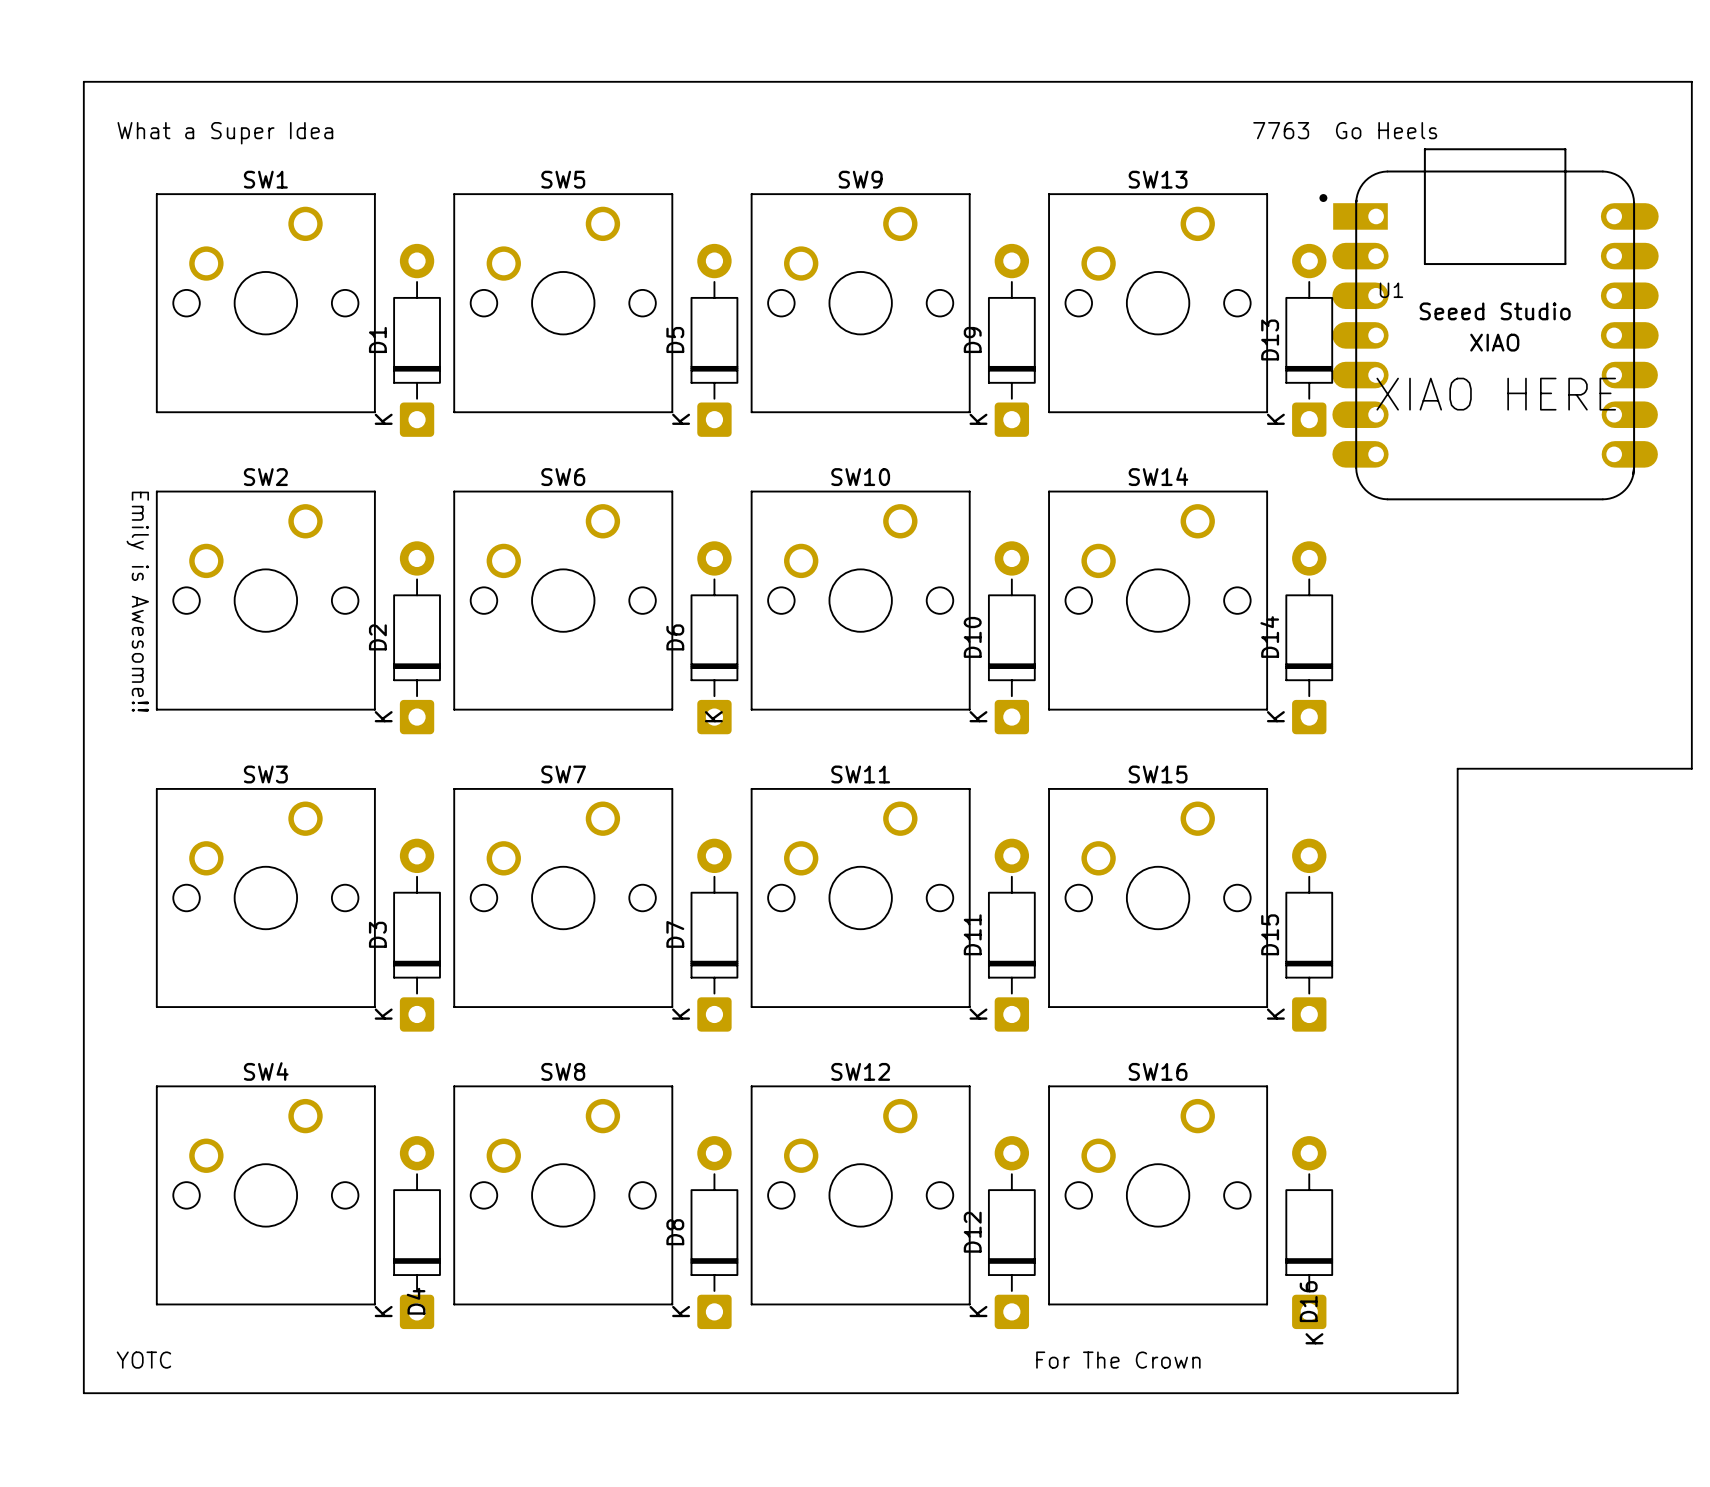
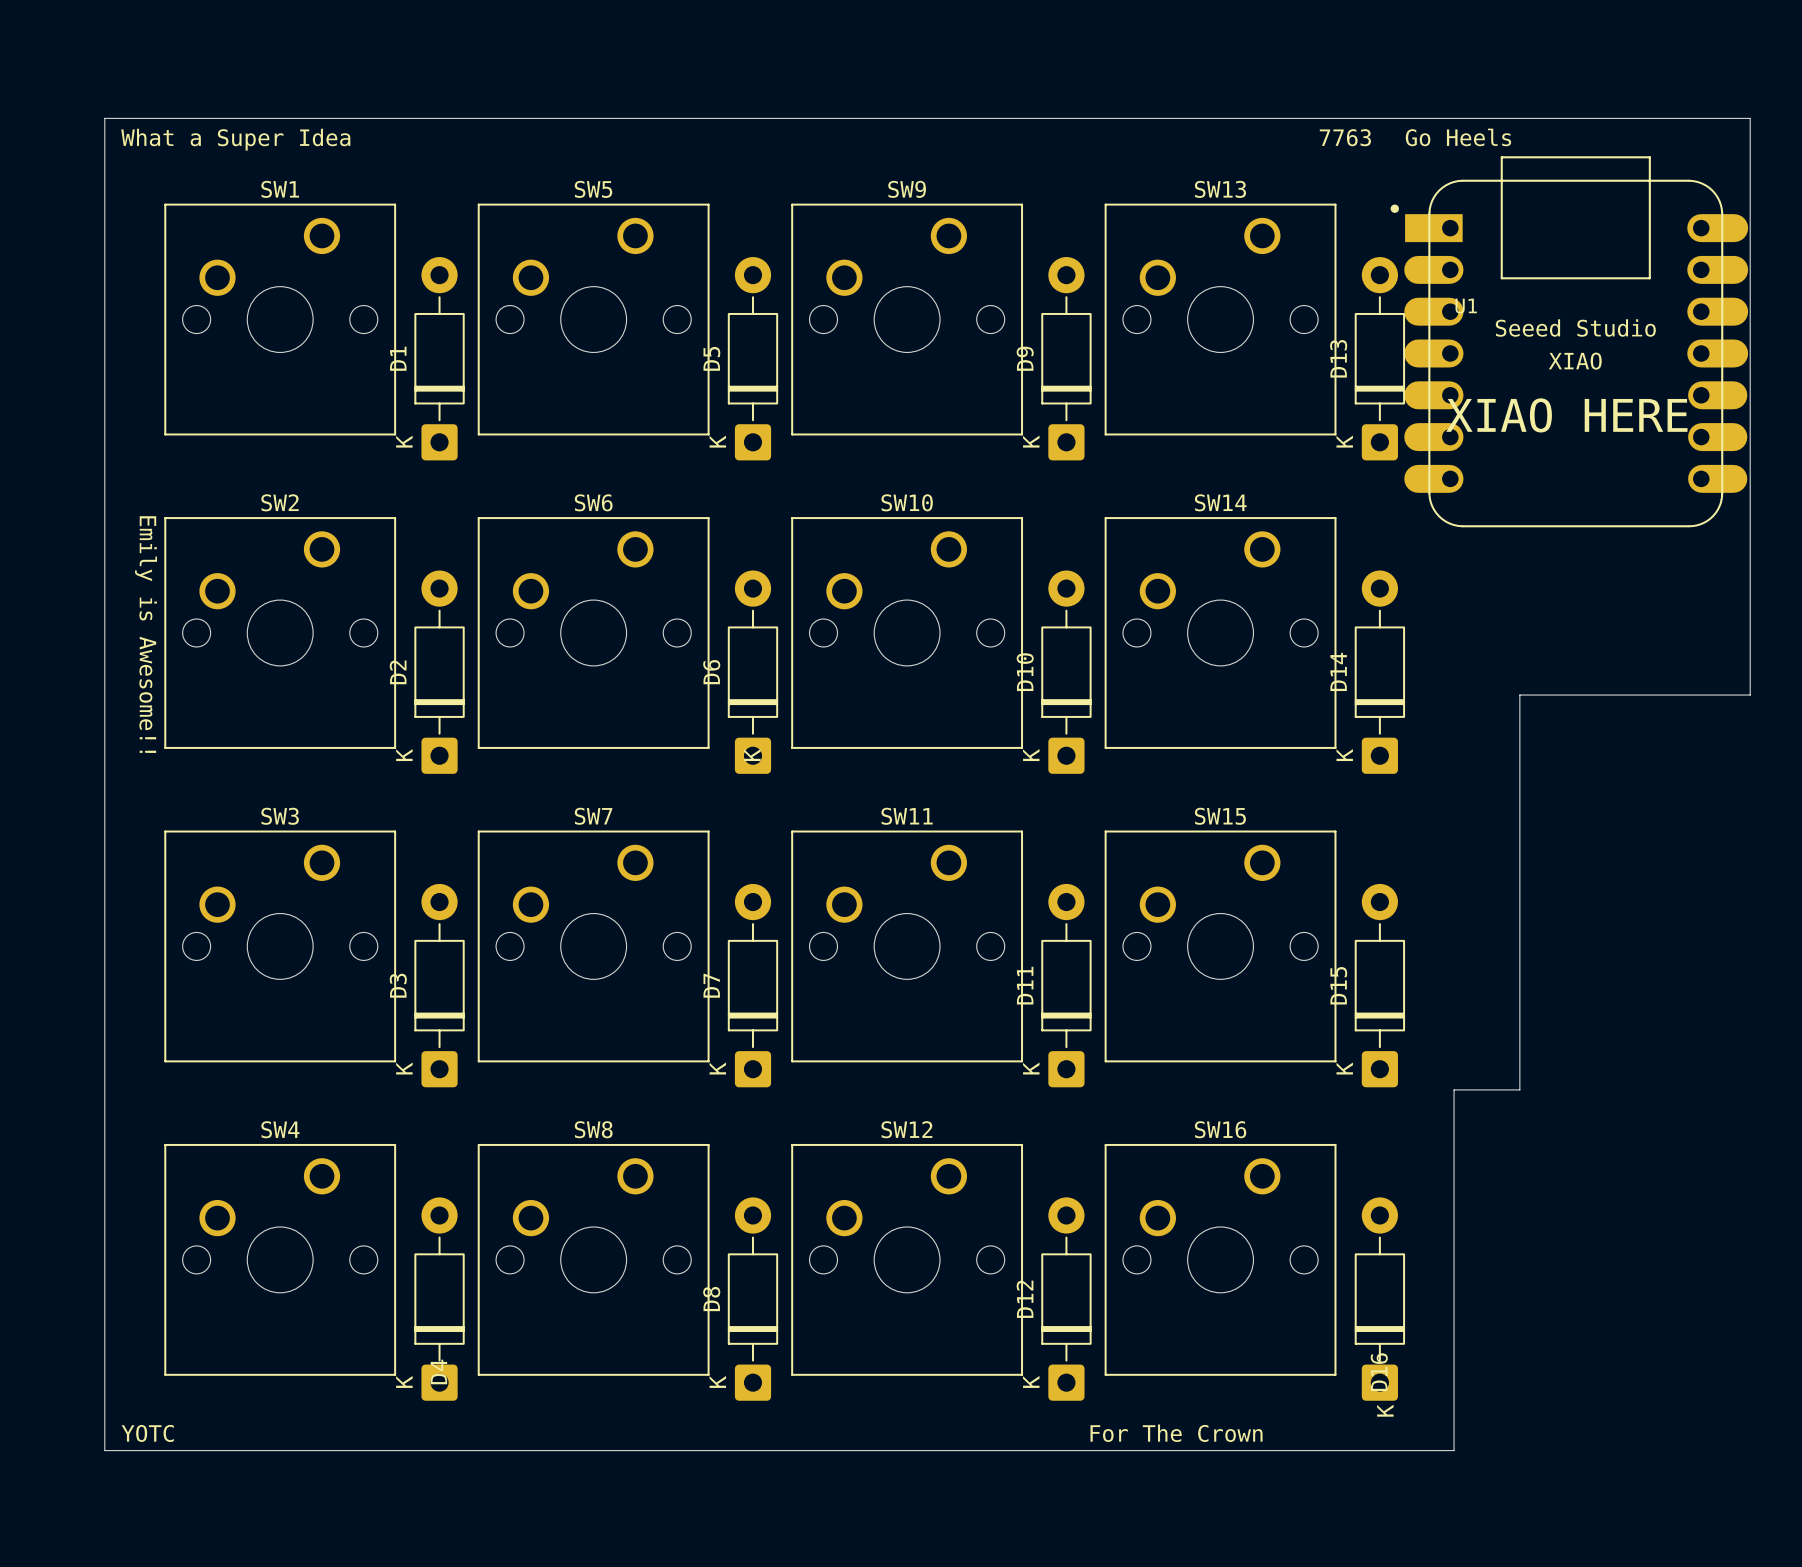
board edge: (83, 81) (83, 1393) (1457, 1393) (1457, 768) (1691, 768) (1691, 81) (83, 81) -> (104, 118) (104, 1450) (1454, 1450) (1454, 1089) (1519, 1089) (1519, 695) (1750, 695) (1750, 118) (104, 118)

